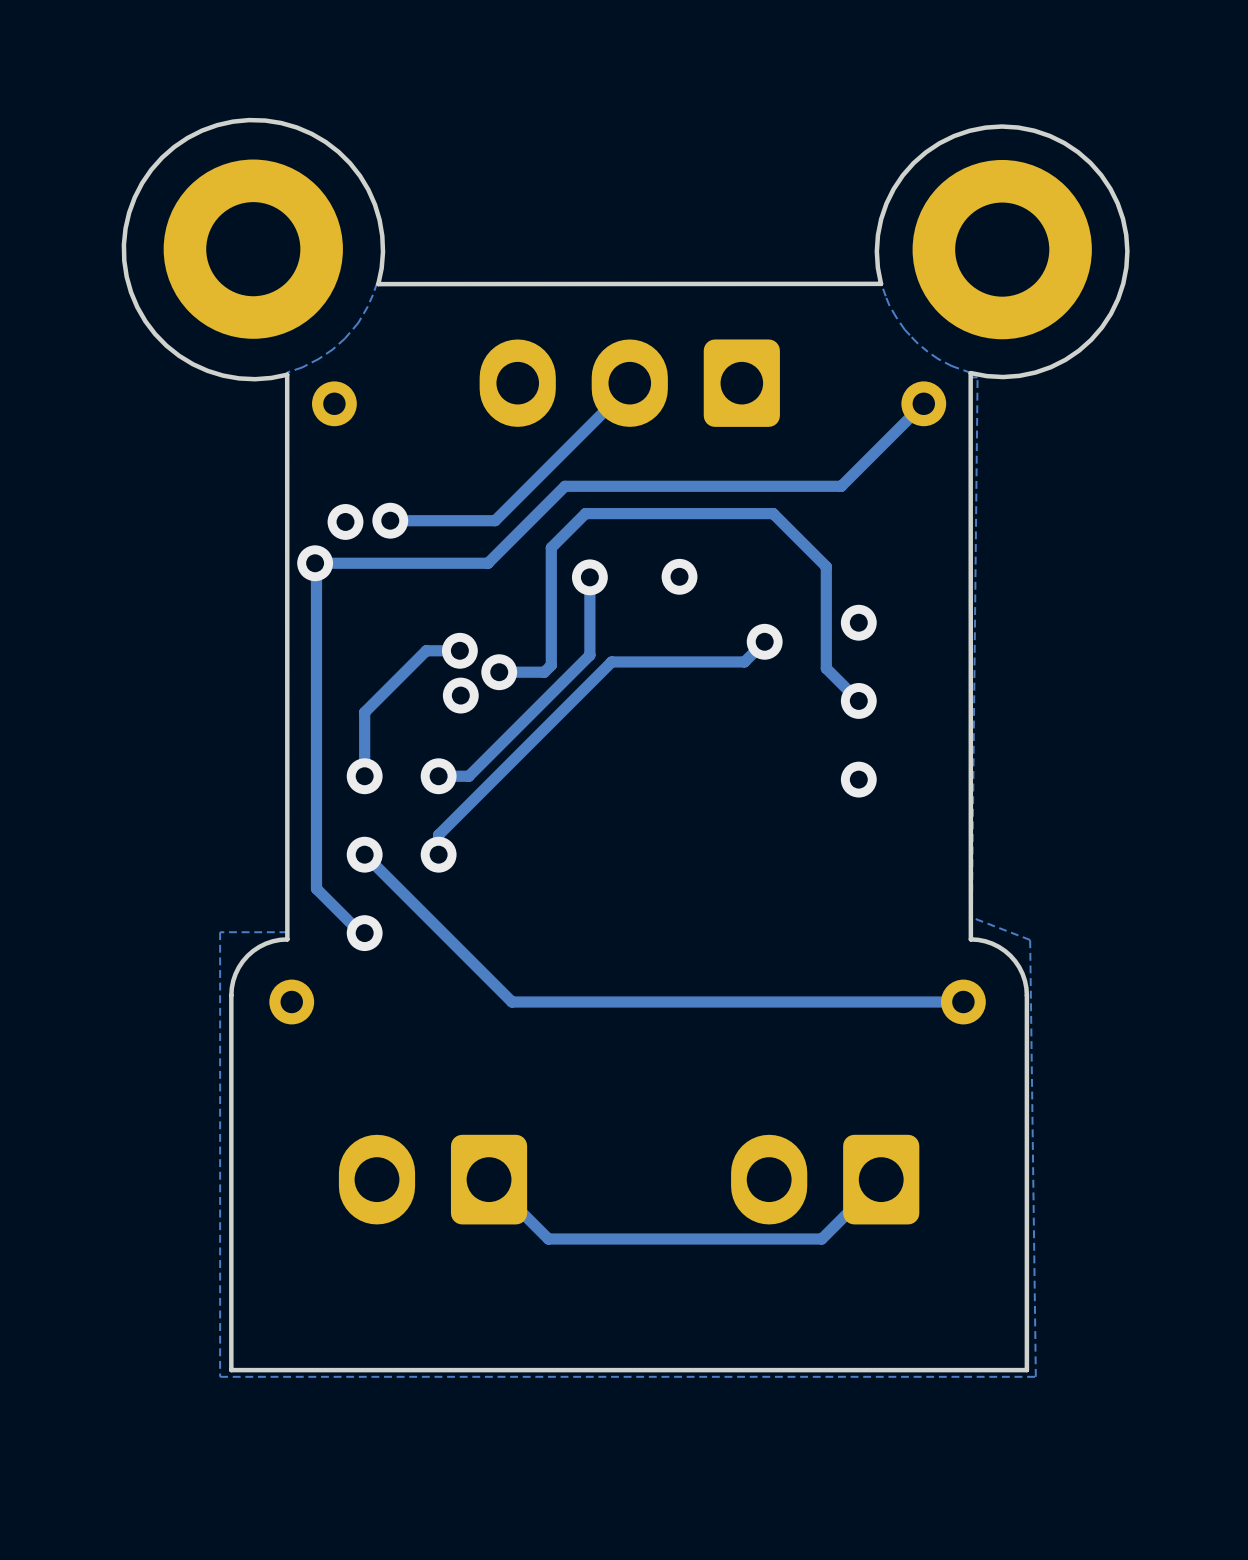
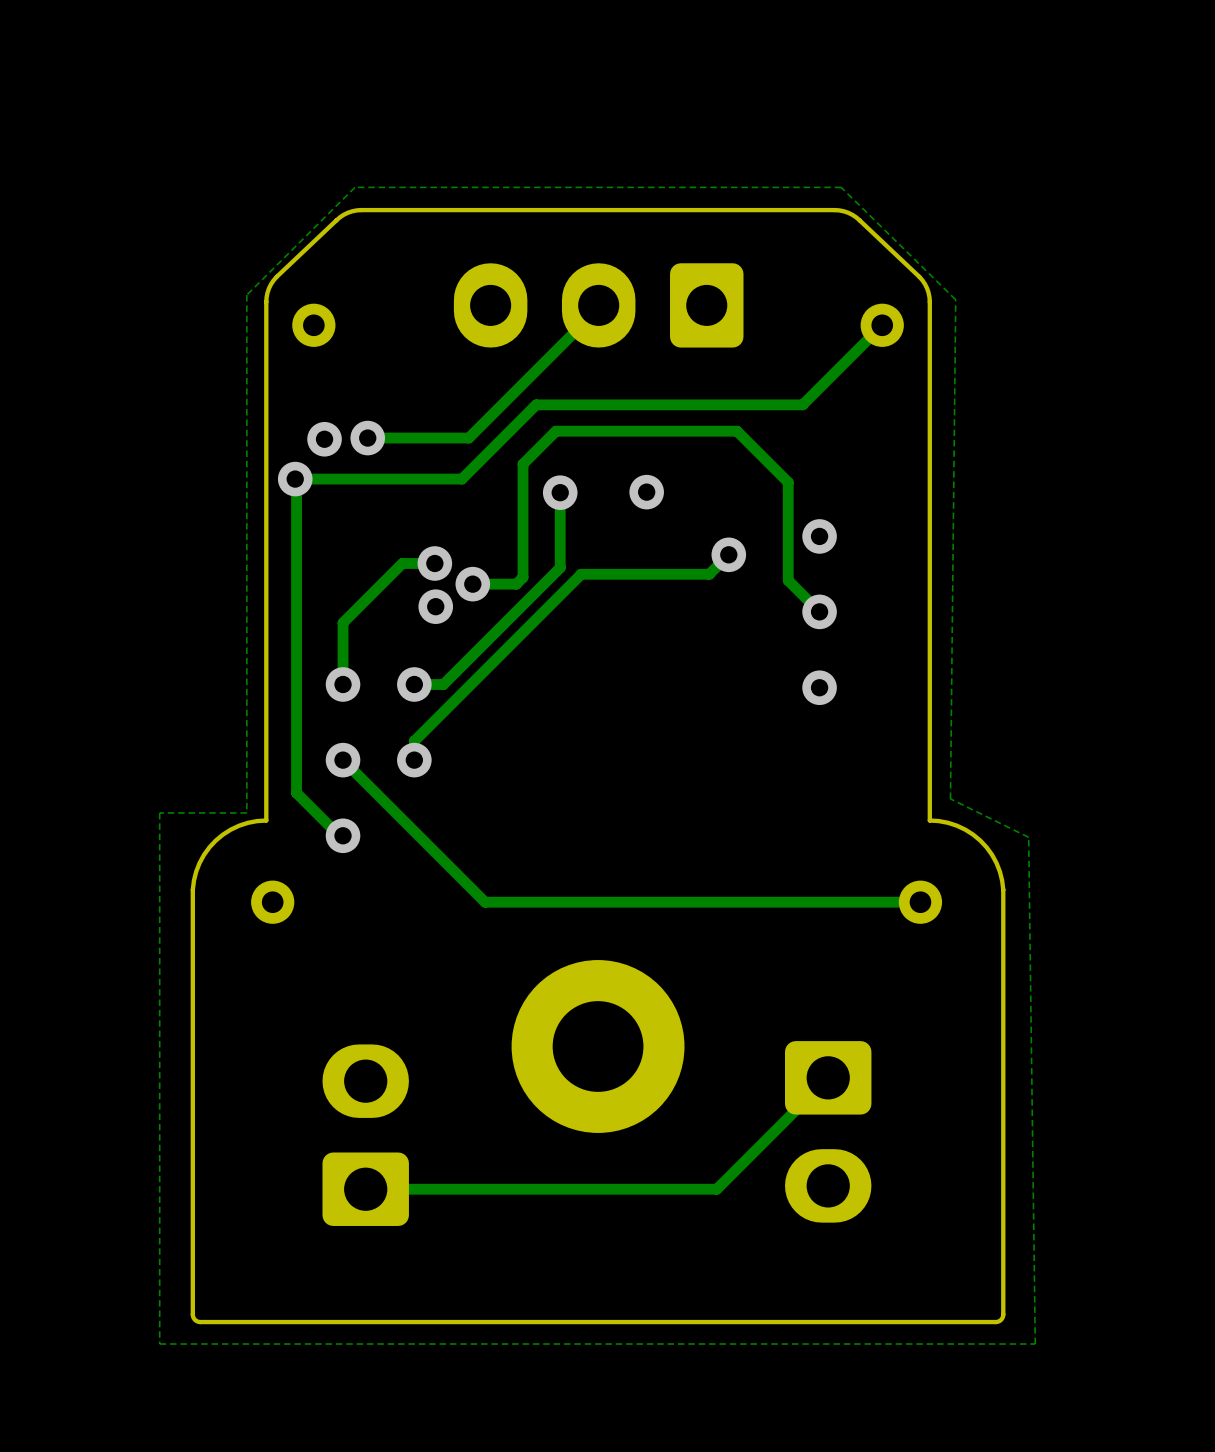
part: (253, 249) -> none
part: (1002, 249) -> none
zone outline: (881, 283) (376, 283) (367, 306) (358, 323) (344, 338) (318, 358) (287, 372) (287, 932) (220, 932) (220, 1376) (1035, 1376) (1030, 939) (971, 917) (977, 377) (970, 377) (970, 372) (938, 358) (917, 342) (896, 316) (881, 283) -> (841, 187) (955, 299) (950, 798) (1028, 837) (1035, 1344) (159, 1344) (159, 812) (246, 812) (246, 295) (354, 187) (841, 187)
board edge: (970, 373) (986, 376) (1019, 375) (1050, 367) (1065, 359) (1091, 339) (1101, 327) (1110, 313) (1123, 283) (1127, 251) (1126, 234) (1122, 218) (1110, 188) (1101, 175) (1078, 152) (1064, 143) (1034, 130) (1001, 126) (969, 130) (939, 143) (913, 163) (893, 189) (881, 219) (876, 251) (881, 283) (378, 284) (382, 252) (382, 236) (379, 220) (368, 189) (360, 175) (338, 151) (311, 133) (281, 123) (265, 120) (249, 120) (217, 125) (187, 137) (162, 157) (151, 169) (134, 197) (129, 212) (123, 244) (124, 260) (131, 292) (145, 321) (166, 345) (192, 364) (207, 370) (223, 375) (255, 379) (287, 374) (287, 939) (265, 943) (253, 950) (238, 967) (231, 988) (231, 1370) (1026, 1370) (1026, 988) (1019, 967) (1010, 955) (992, 943) (970, 939) (970, 373) -> (834, 210) (848, 212) (859, 220) (919, 276) (927, 288) (929, 297) (929, 820) (948, 822) (973, 834) (992, 854) (1002, 880) (1002, 1318) (995, 1322) (196, 1320) (192, 1314) (192, 889) (199, 862) (215, 840) (239, 825) (266, 820) (266, 301) (271, 284) (339, 217) (356, 210) (834, 210)
part: none -> (598, 1046)
part rotation: 0° (433, 1179) -> 90° clockwise (365, 1135)
part rotation: 0° (825, 1179) -> 90° counterclockwise (828, 1131)
track: (881, 1179) (821, 1239) (548, 1239) (489, 1179) -> none
track: none -> (828, 1077) (716, 1189) (365, 1189)

